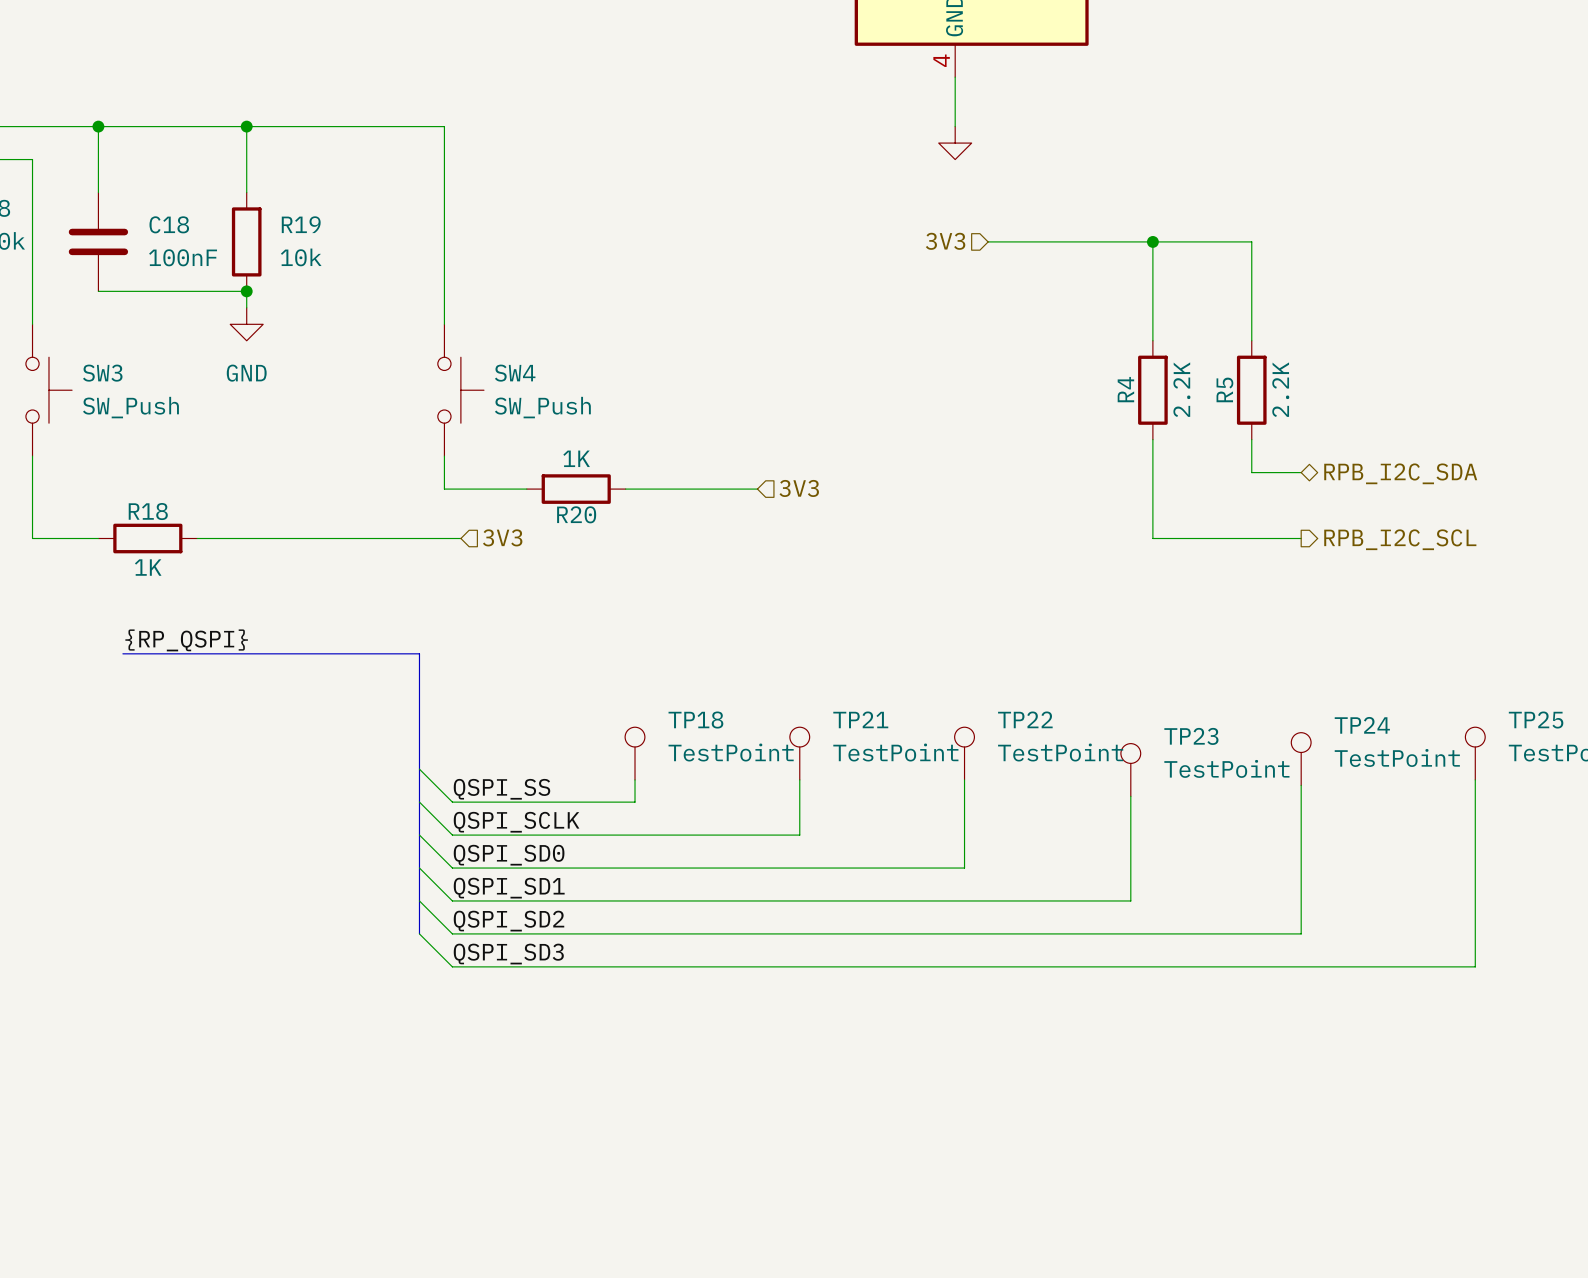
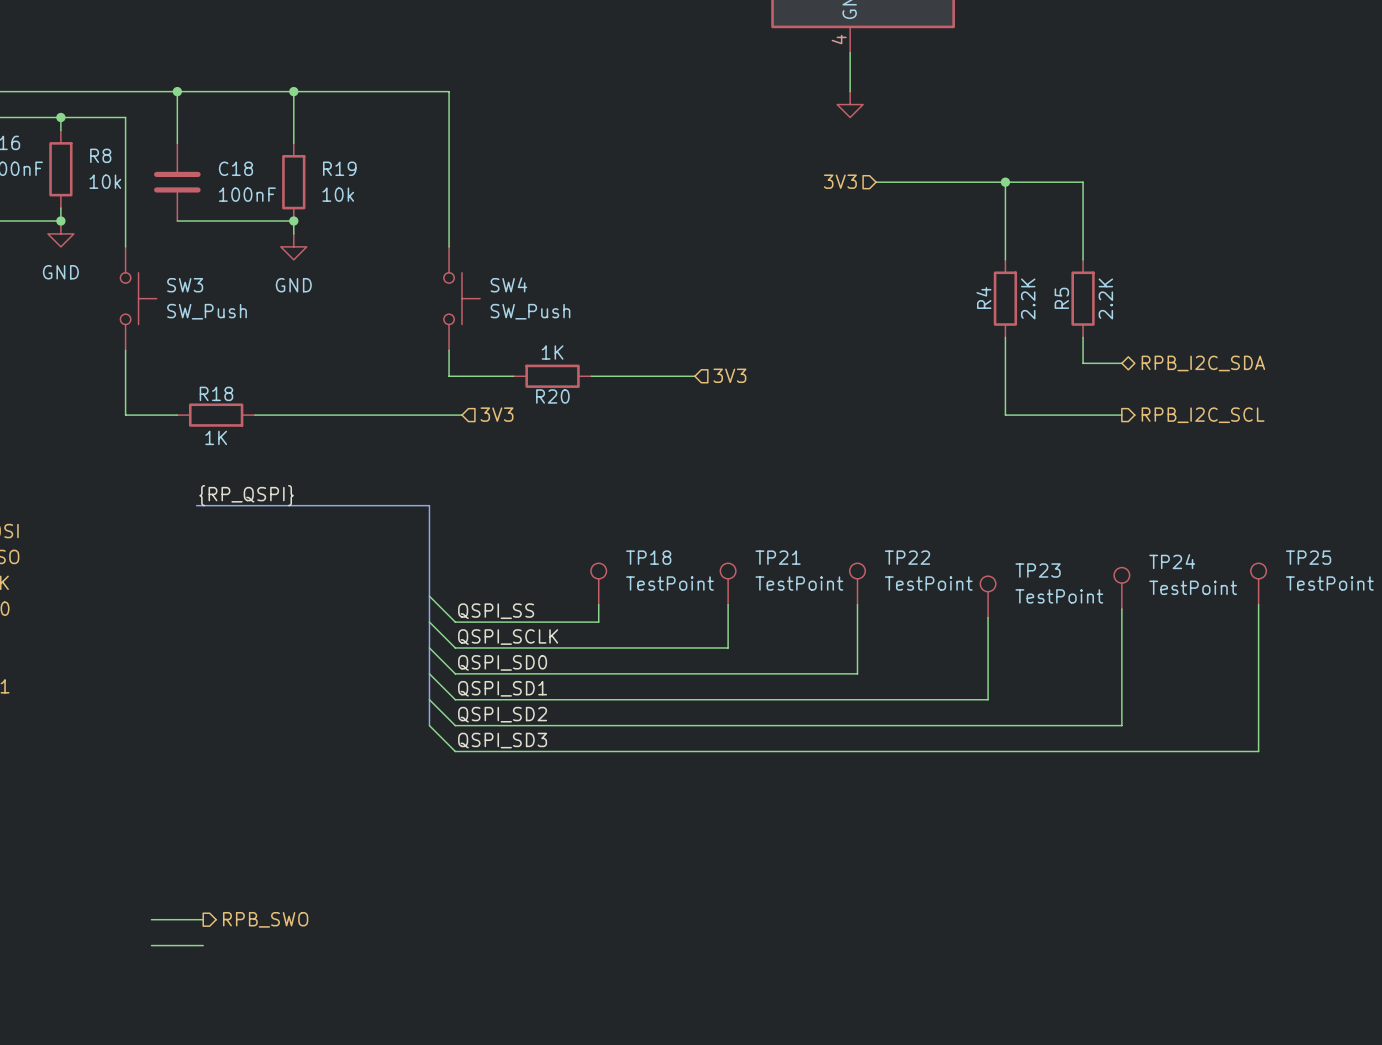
wire: none -> (151, 919) (203, 919)
hierarchical label: none -> RPB_SWO (265, 919)
wire: none -> (151, 945) (203, 945)

